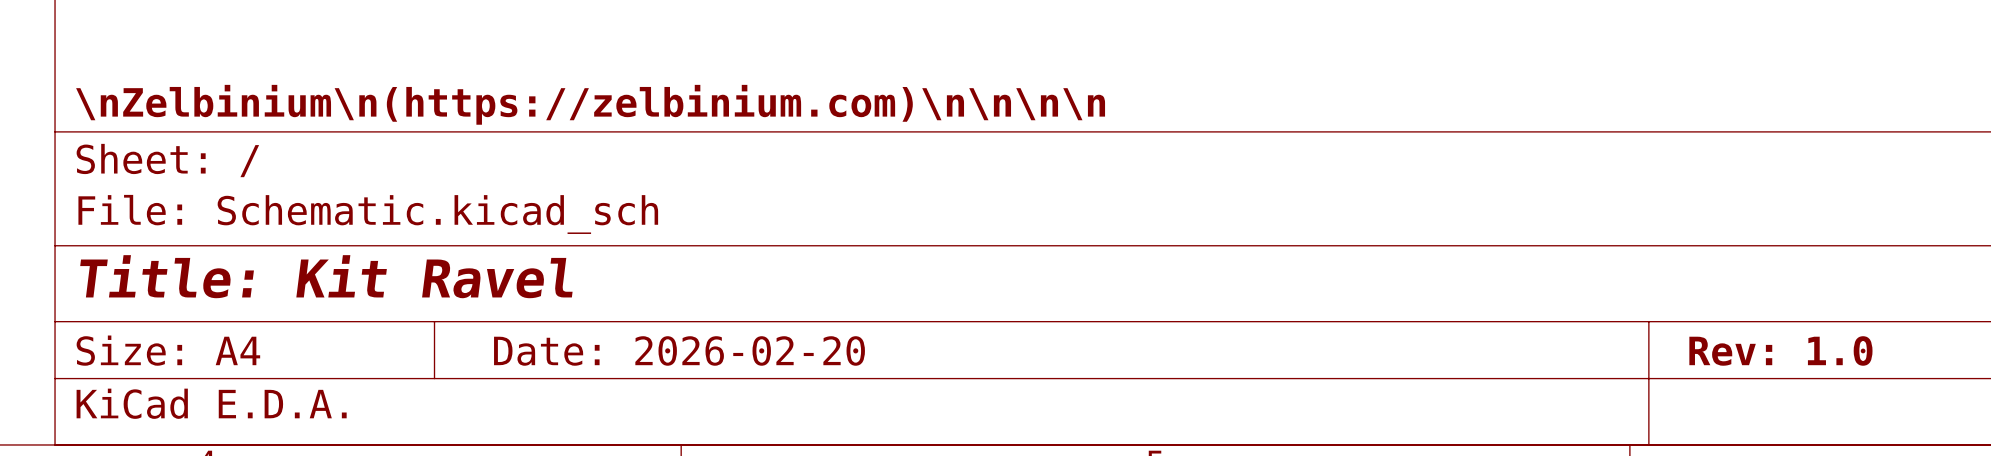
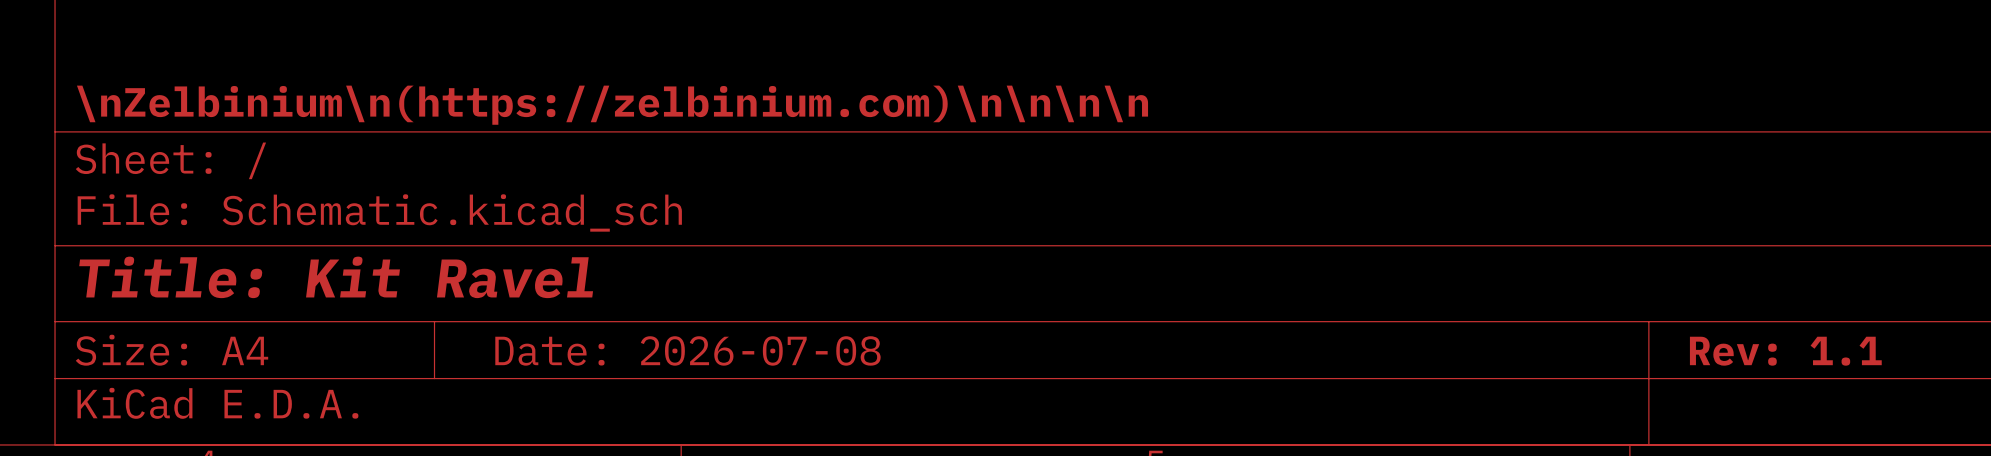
title block: Date: 2026-02-20 (679, 350) -> Date: 2026-07-08 (687, 350)
title block: Rev: 1.0 (1780, 350) -> Rev: 1.1 (1785, 351)

